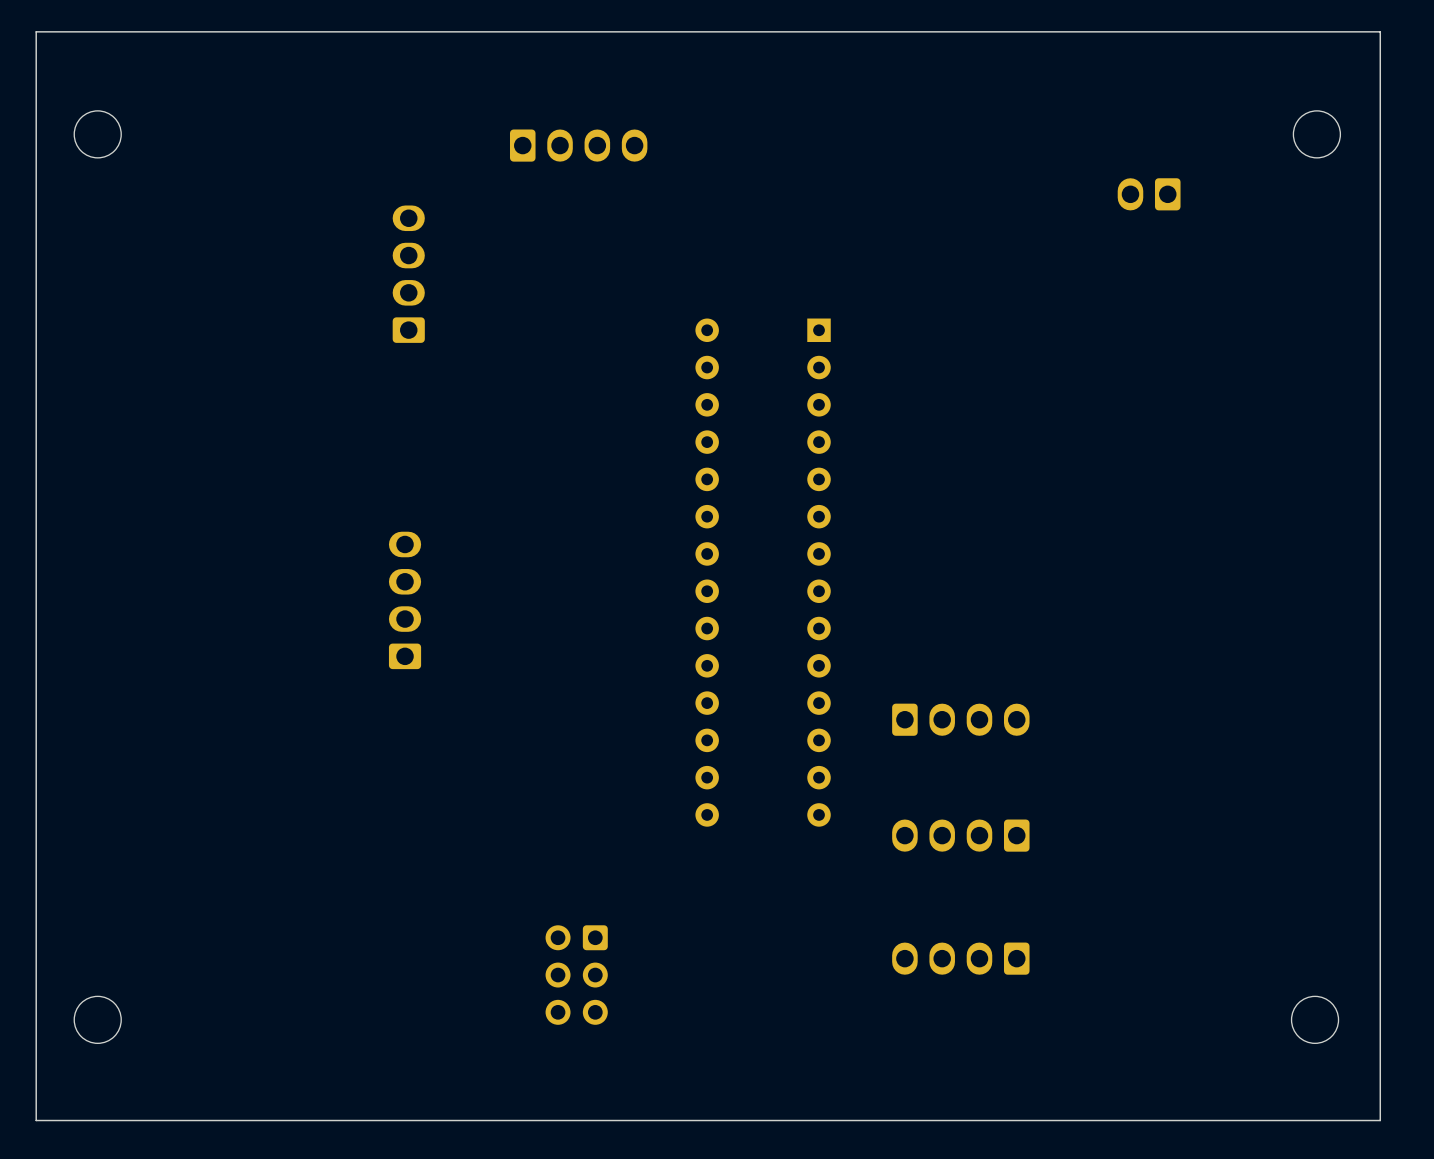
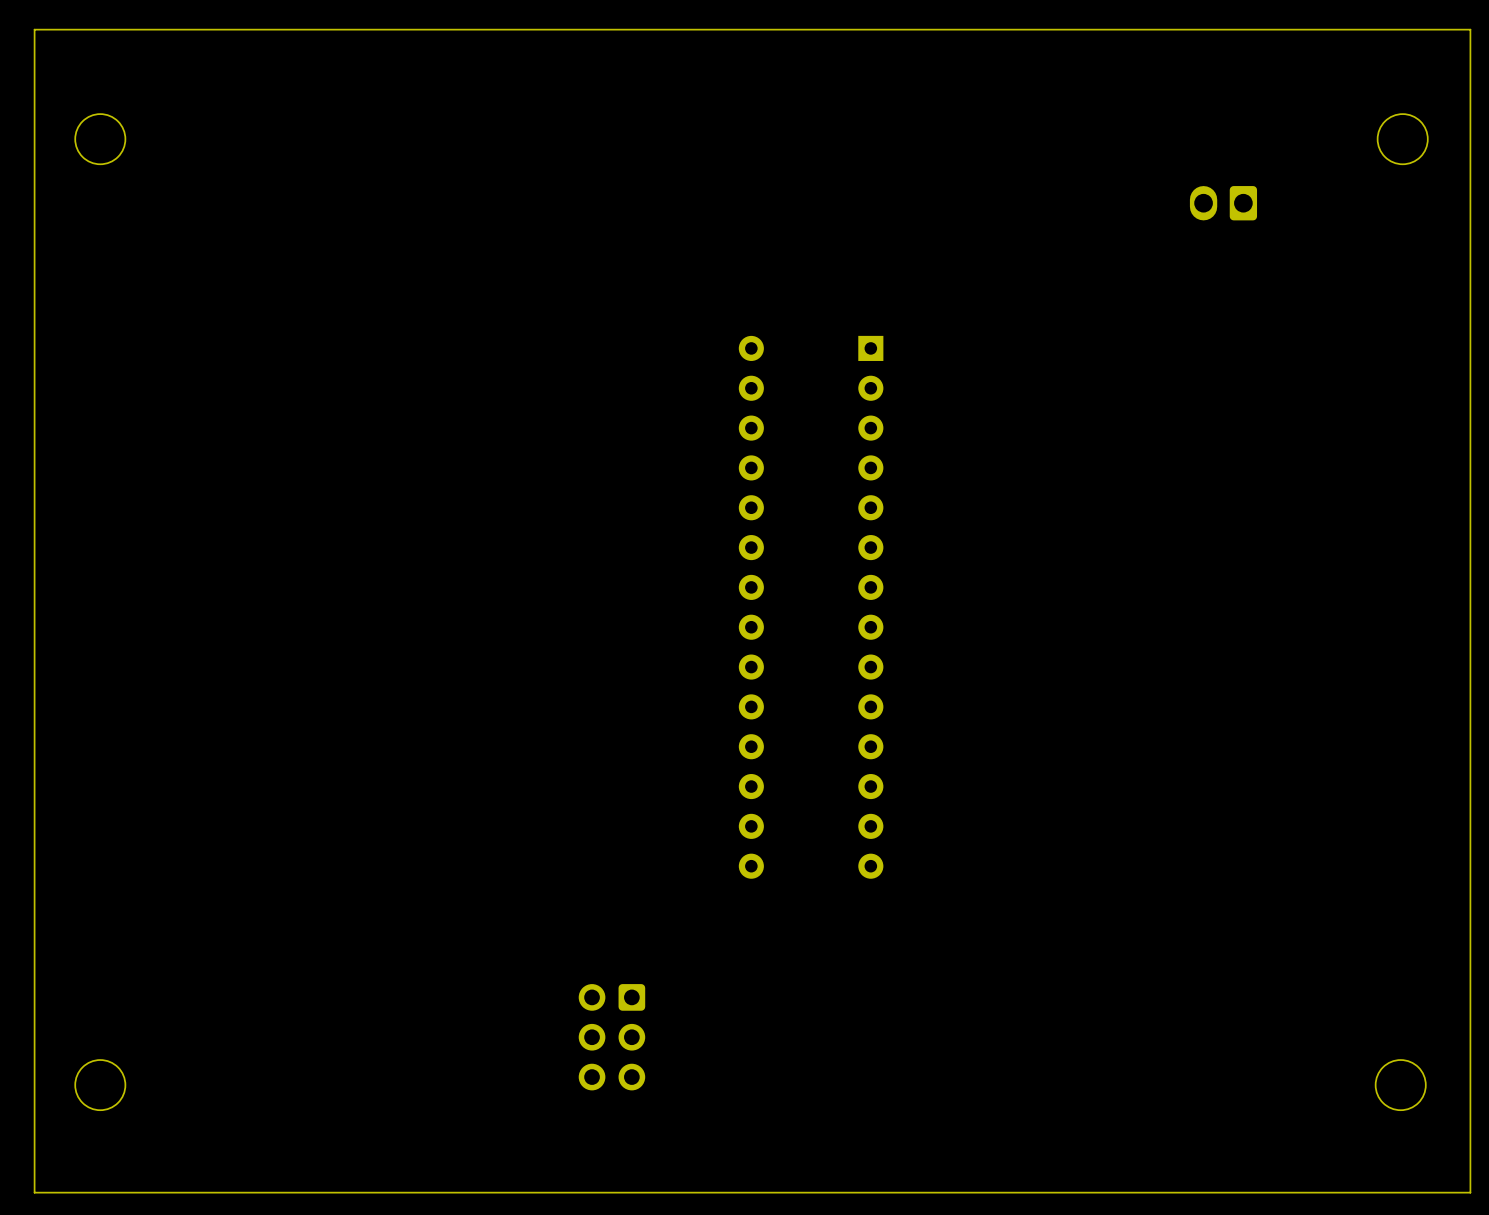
part: (578, 145) -> none
part: (408, 274) -> none
part: (405, 600) -> none
part: (960, 719) -> none
part: (960, 835) -> none
part: (960, 958) -> none

